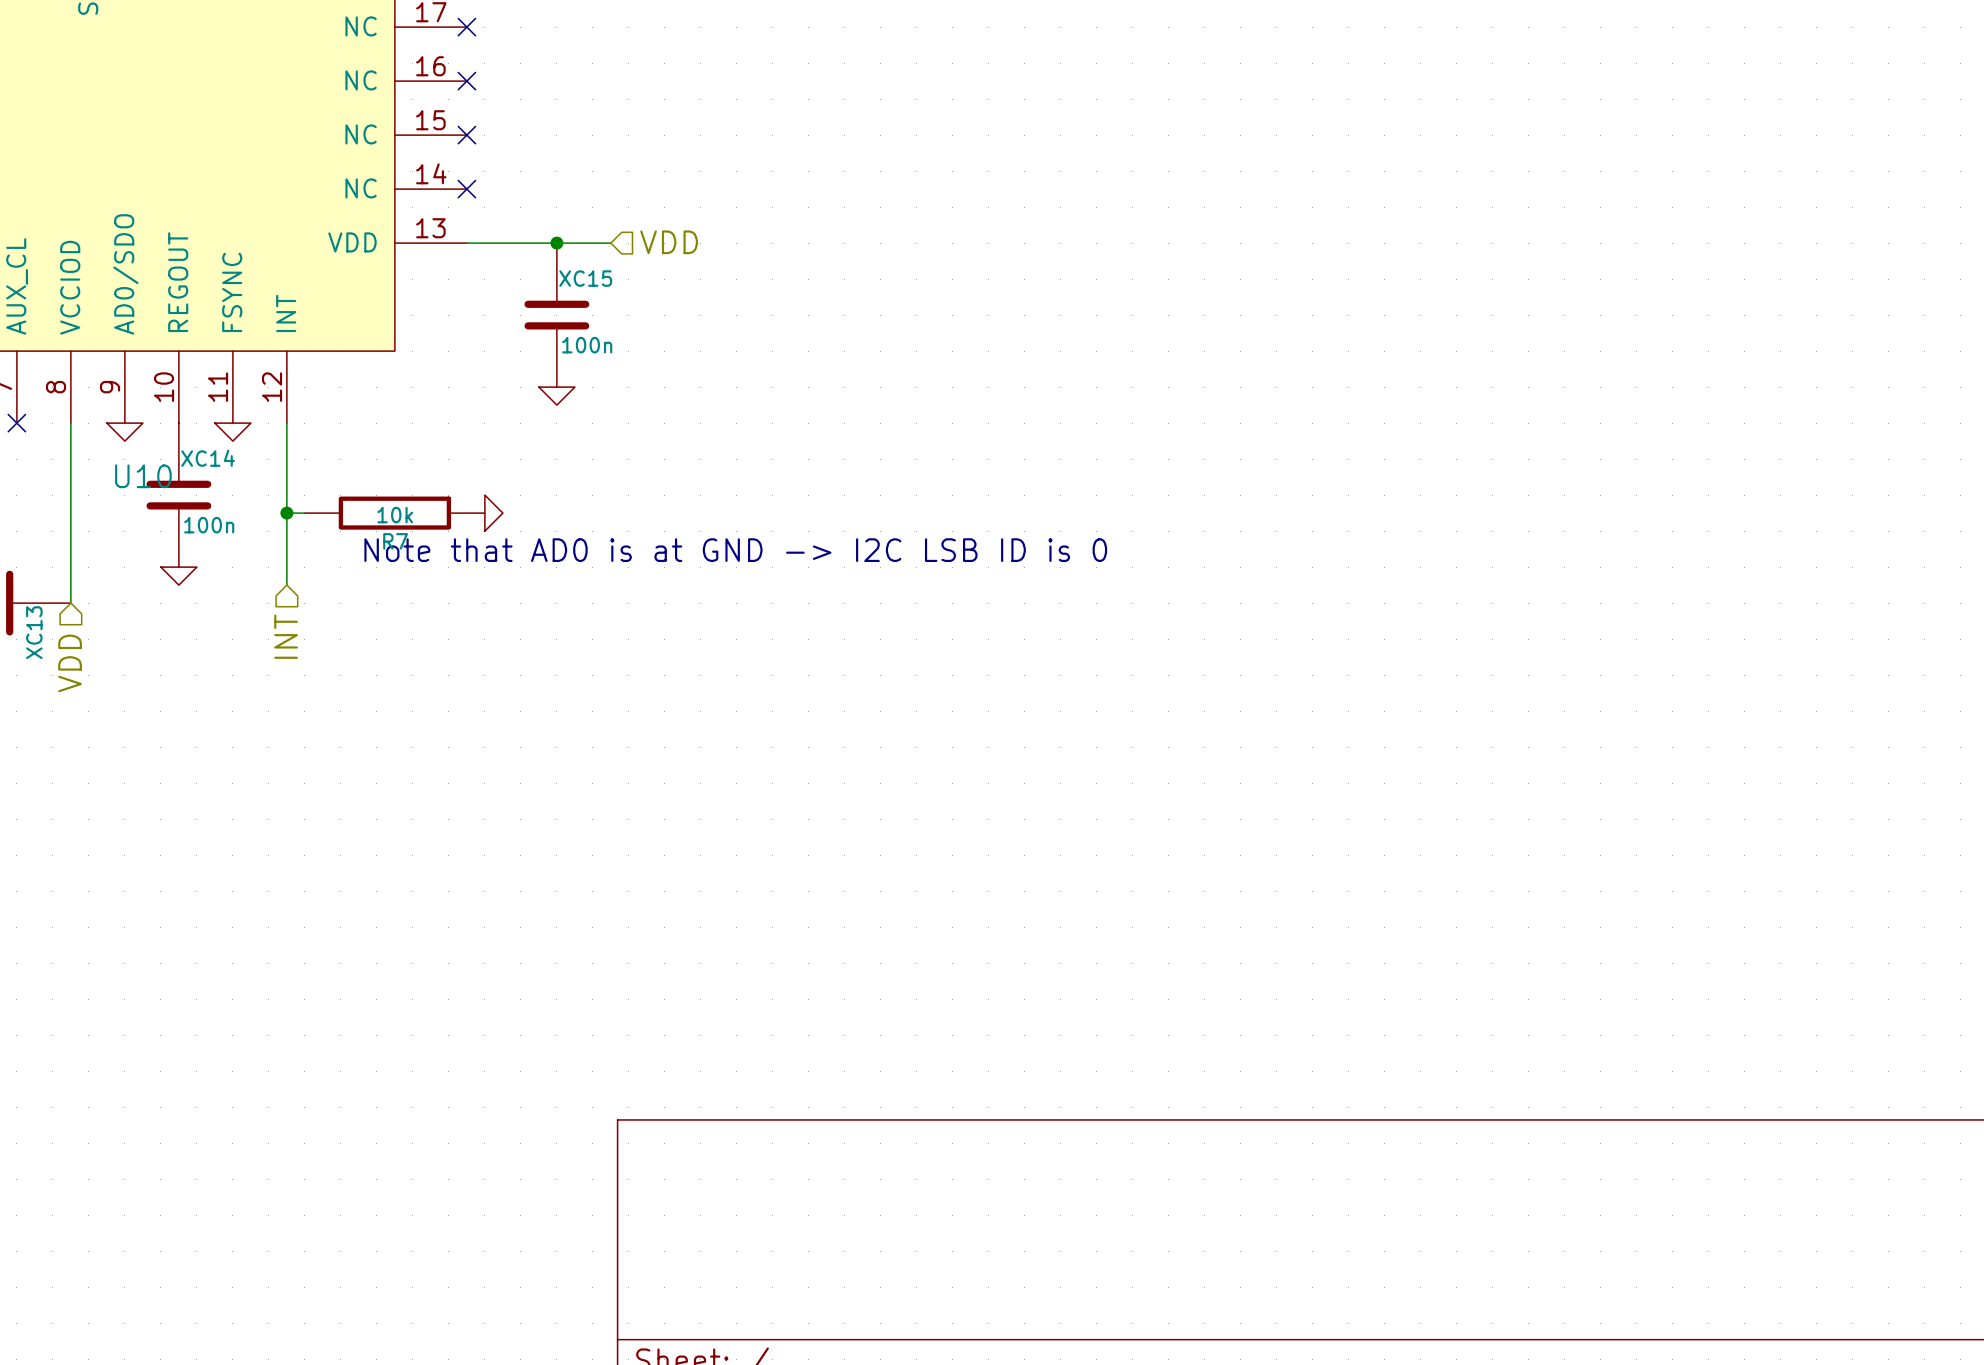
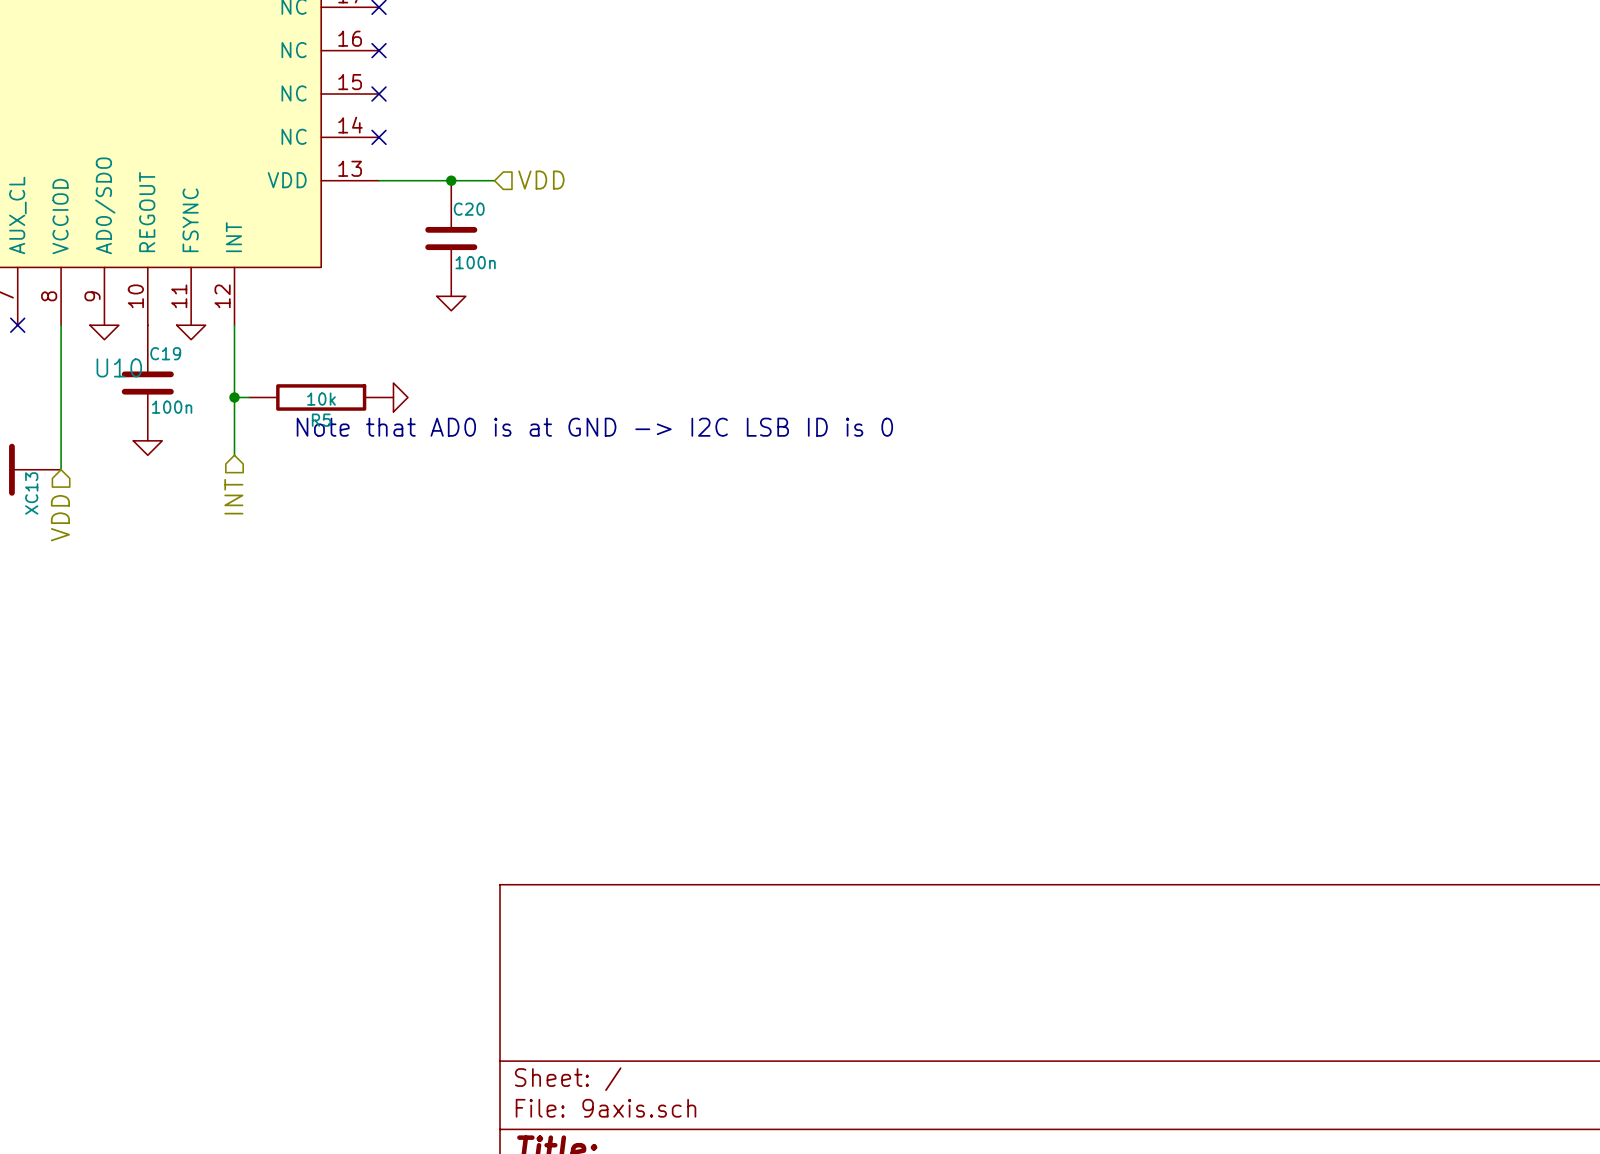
XC15 name: XC15 (585, 278) -> C20 (469, 209)
XC14 name: XC14 (208, 458) -> C19 (165, 353)
R7 name: R7 (395, 541) -> R5 (321, 420)

